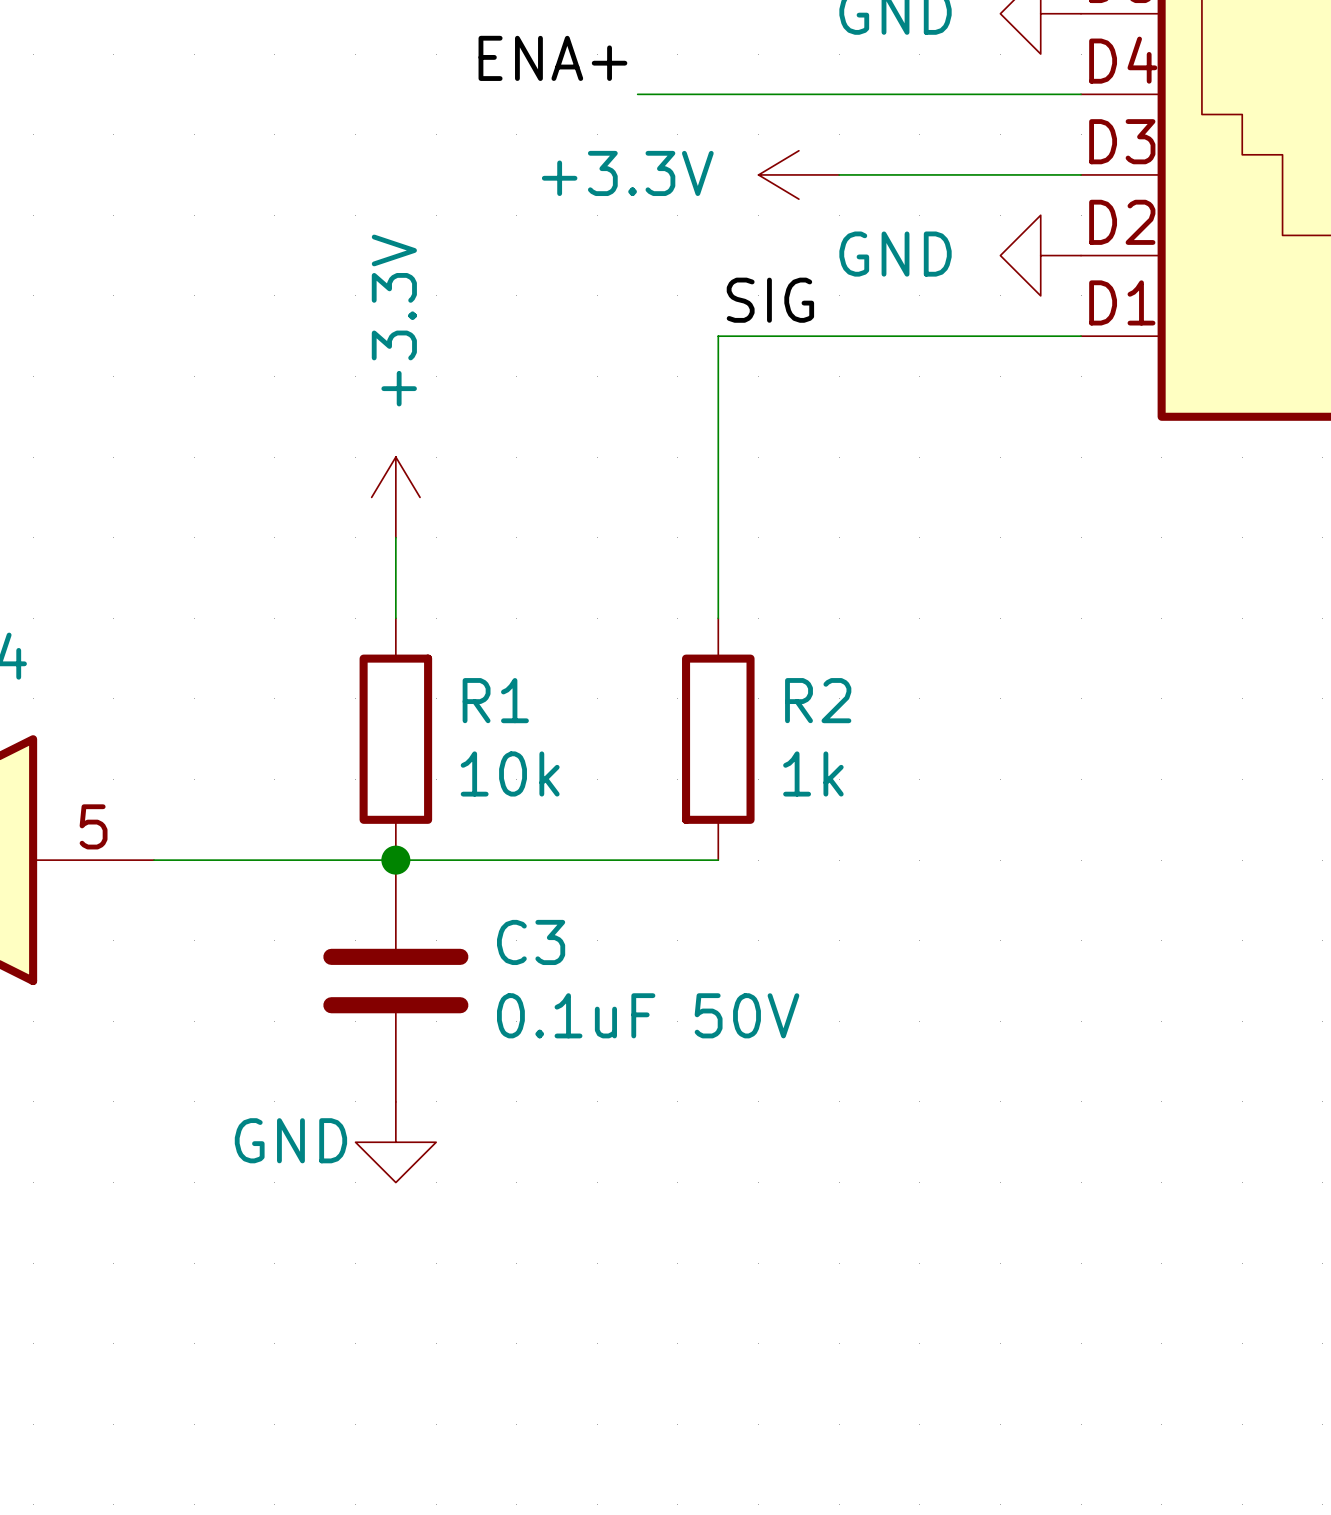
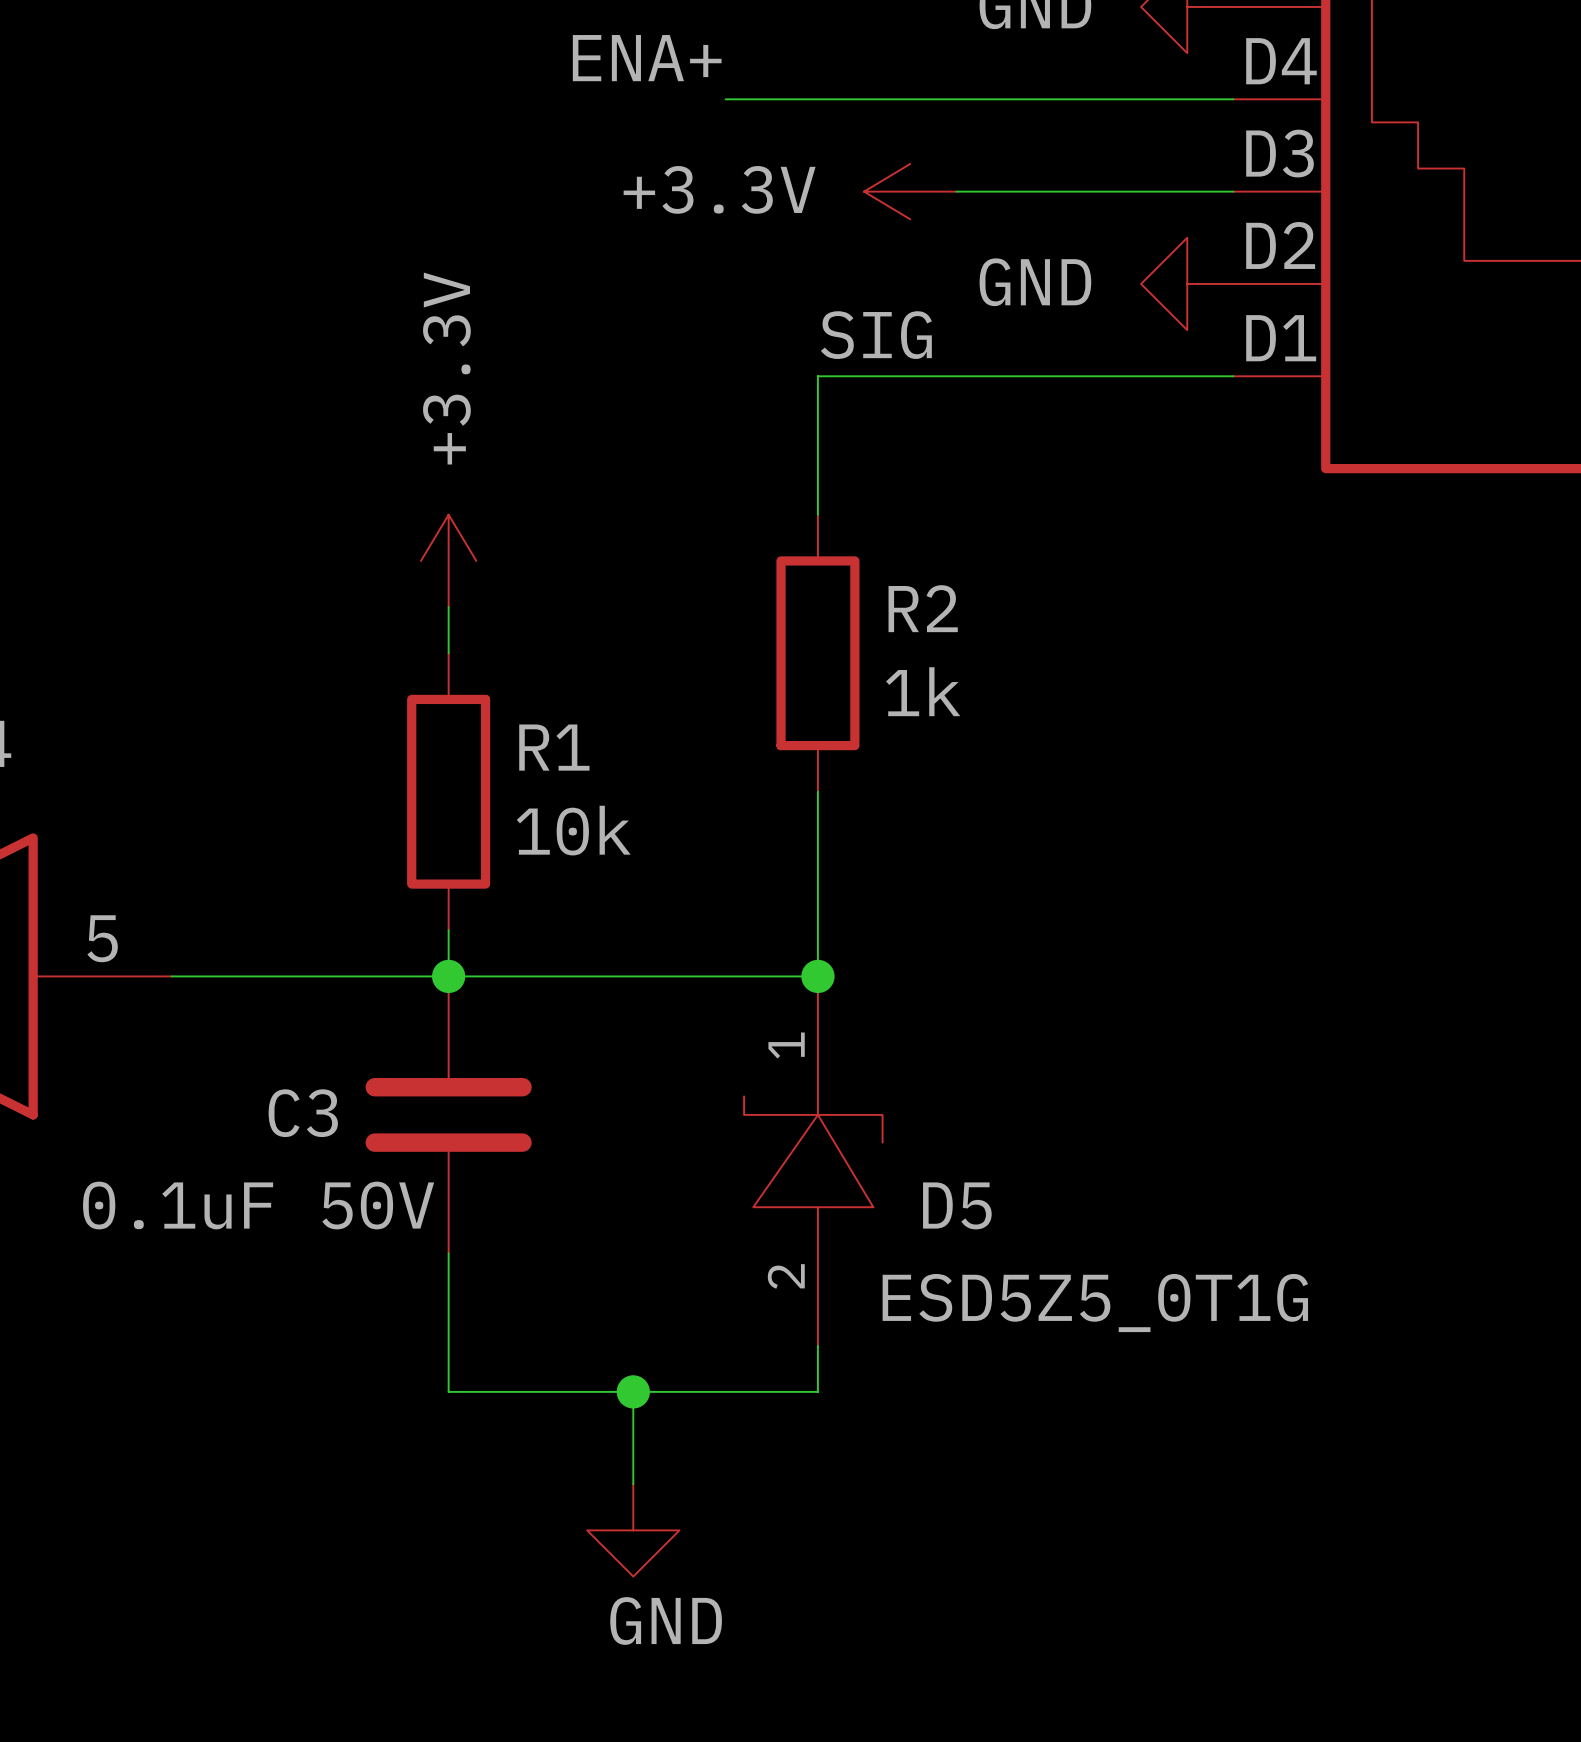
wire: (718, 457) (718, 618) -> (817, 791) (817, 976)
R1 position: (395, 739) -> (448, 791)
R2 position: (718, 739) -> (817, 653)
junction: none -> (817, 976)
C3 name position: C3 (531, 942) -> C3 (303, 1113)
C3 value position: 0.1uF 50V (648, 1015) -> 0.1uF 50V (258, 1205)
D5: none -> ESD5Z5_0T1G (813, 1161)
wire: none -> (448, 1253) (448, 1391) (817, 1391) (817, 1345)
power symbol text position: GND (290, 1140) -> GND (666, 1620)
power symbol position: GND (395, 1142) -> GND (633, 1530)
wire: none -> (633, 1391) (633, 1484)
junction: none -> (633, 1391)

